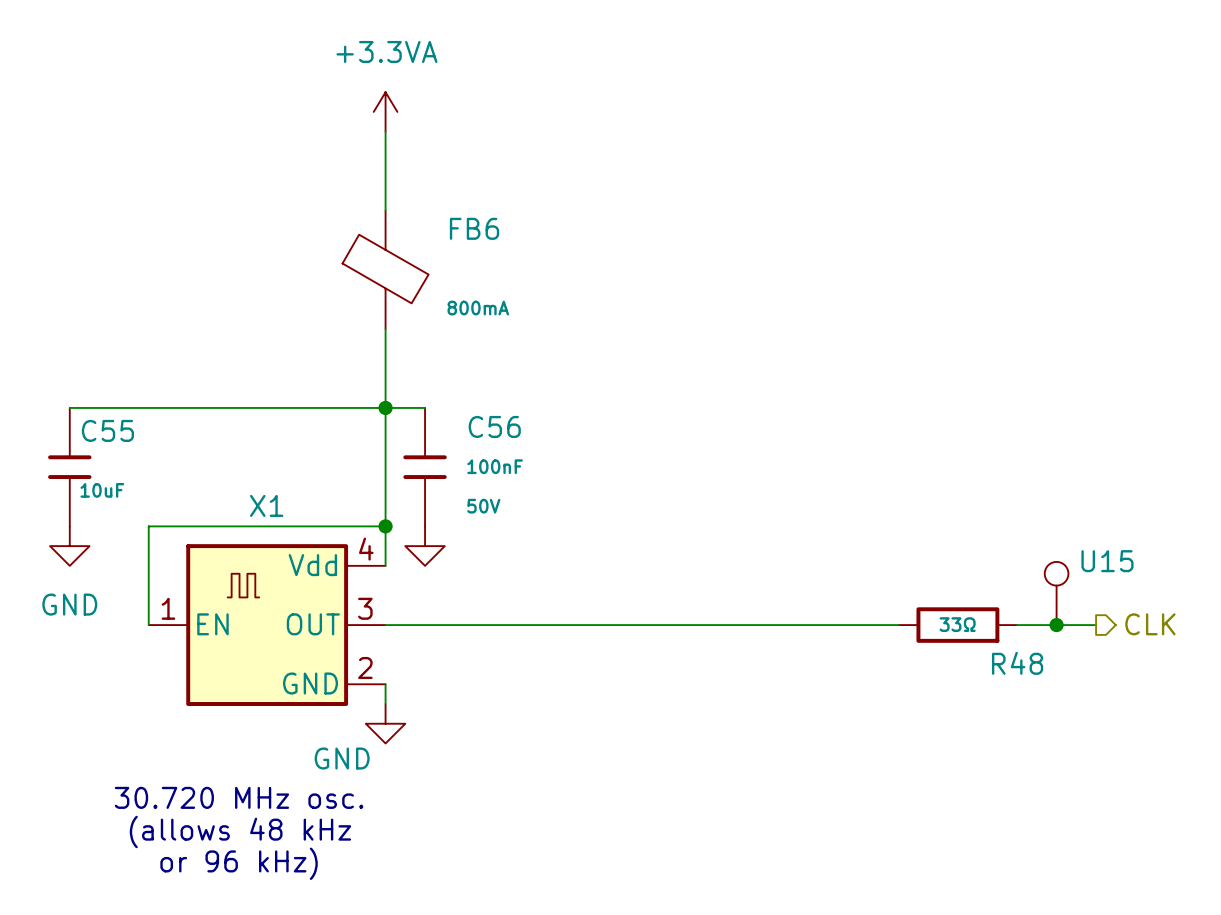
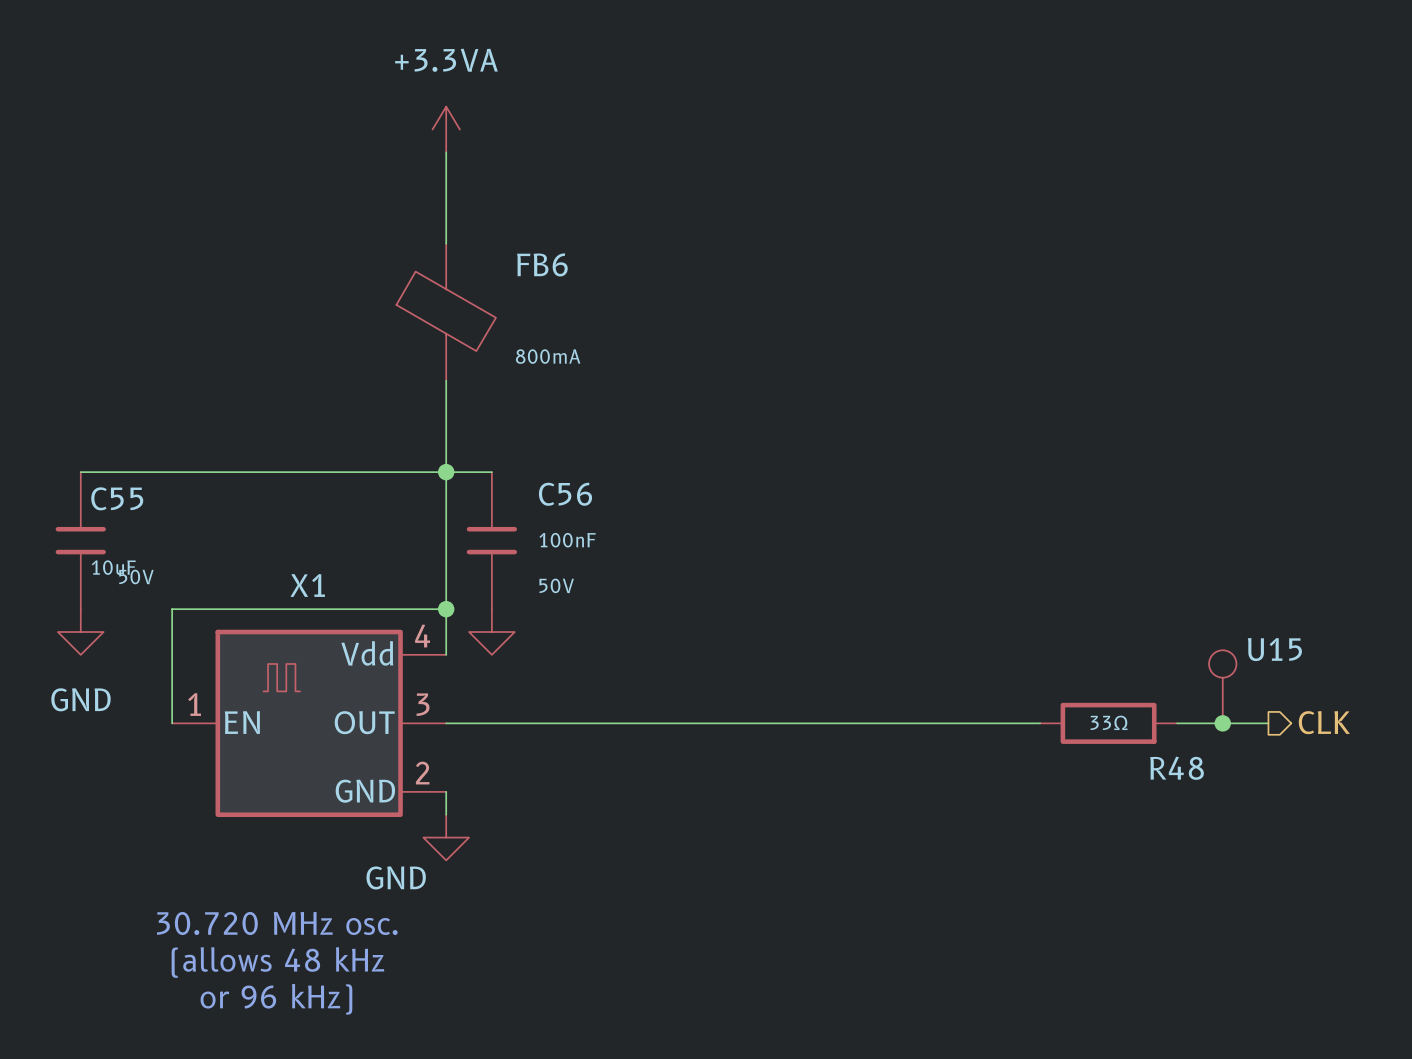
C55 text: none -> 50V (136, 577)

